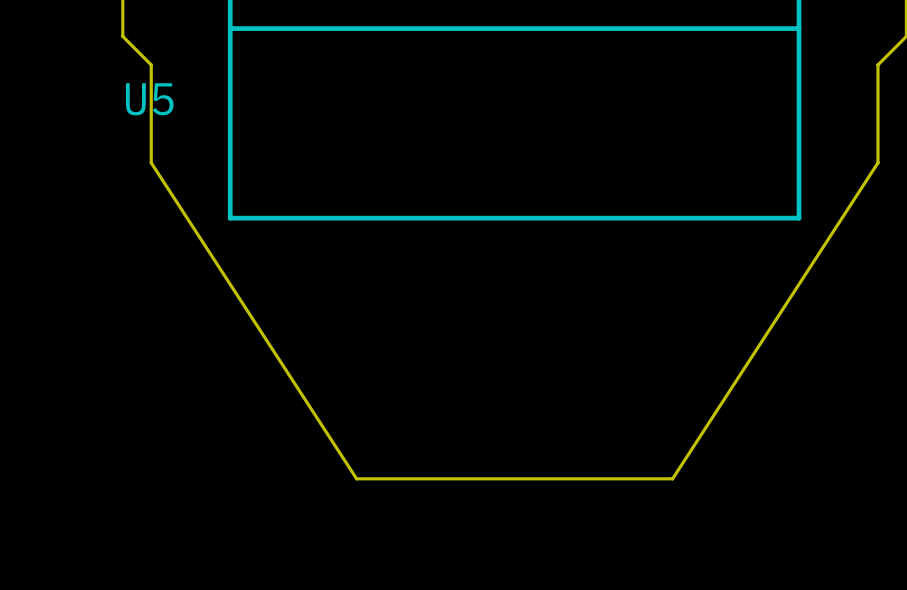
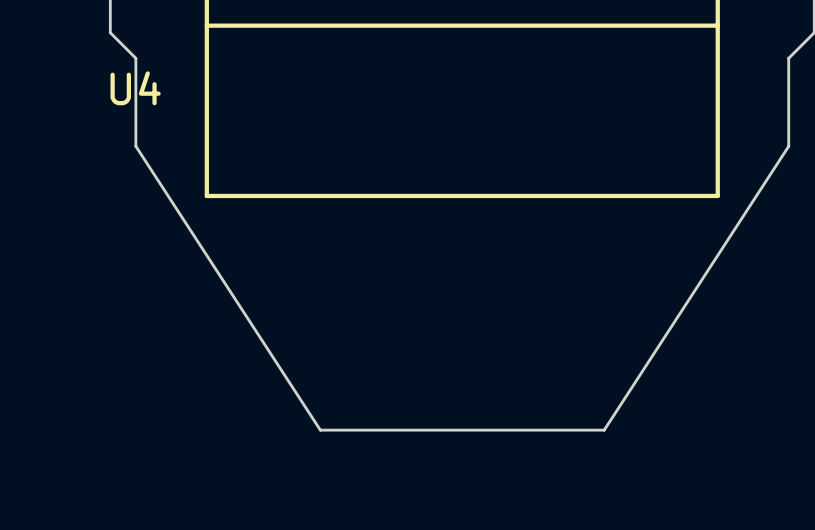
U5 name: U5 (149, 99) -> U4 (135, 88)

